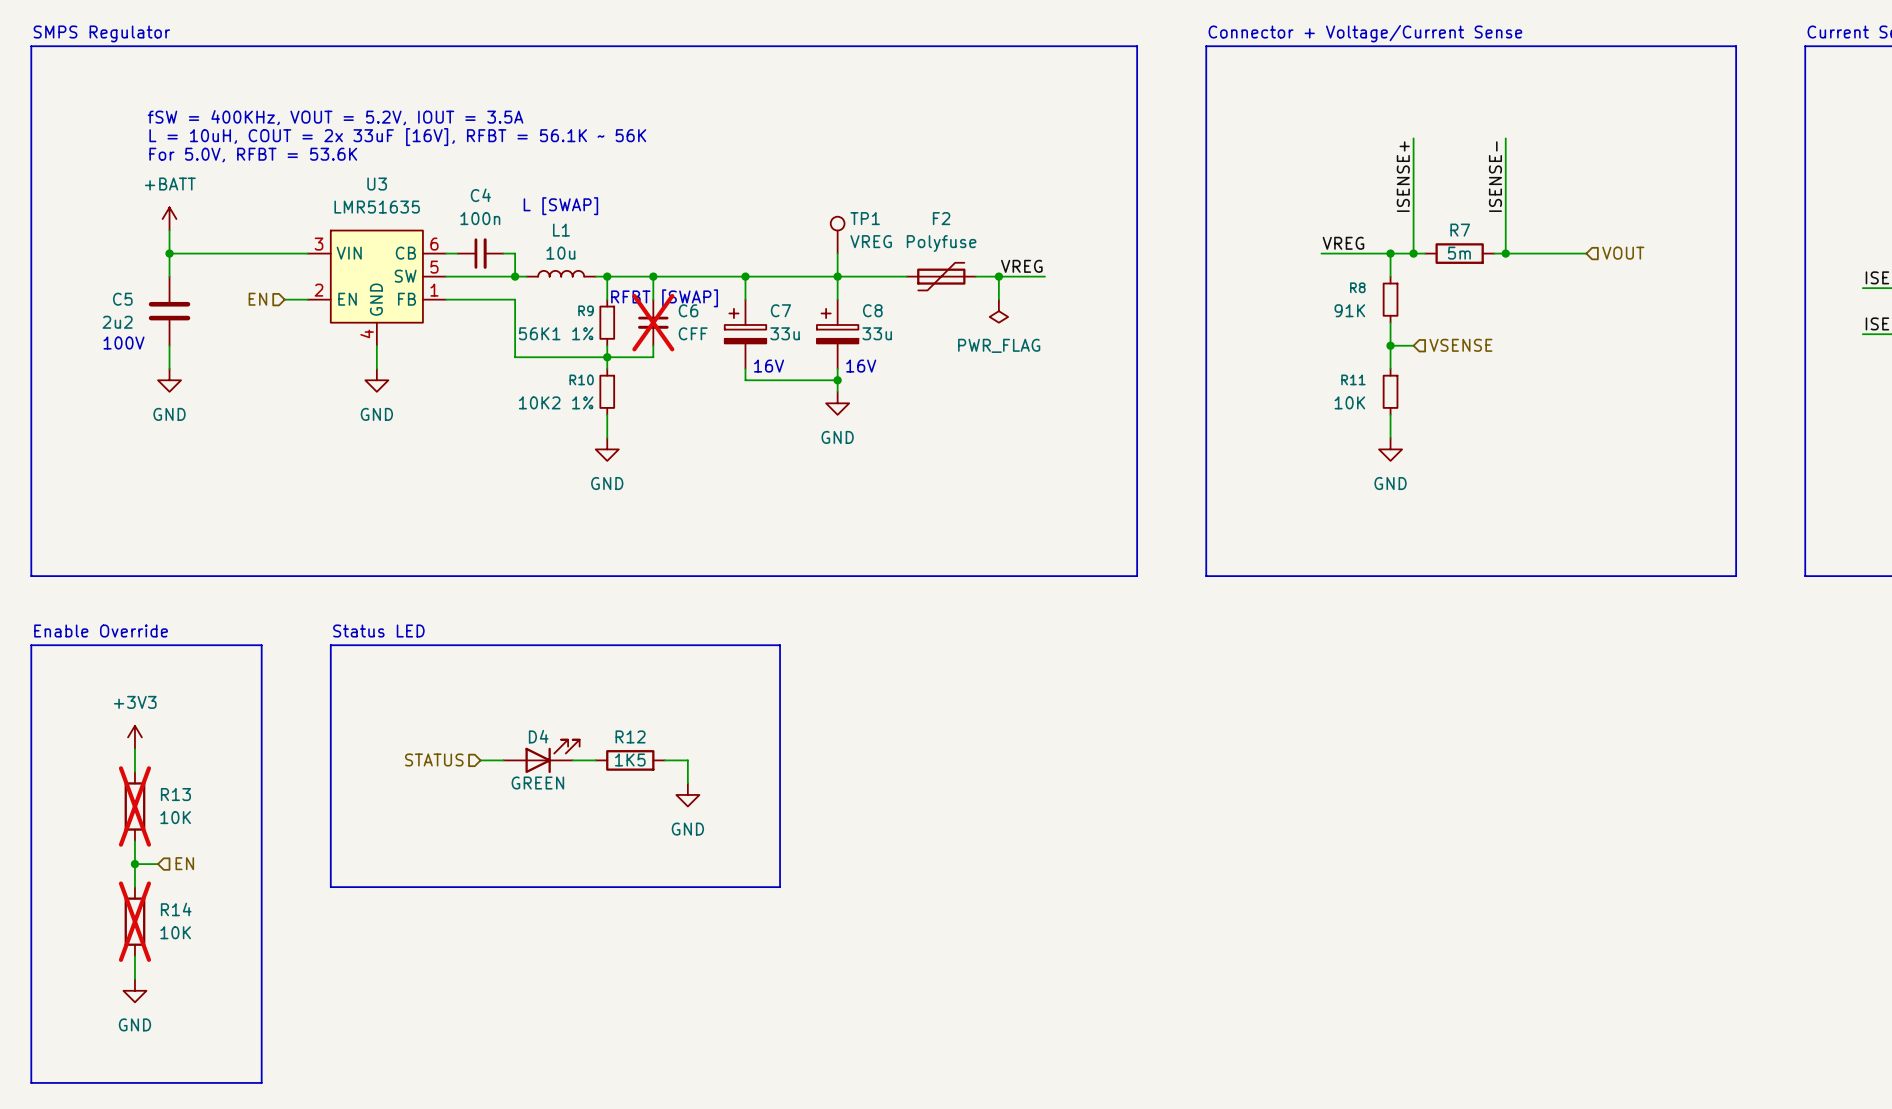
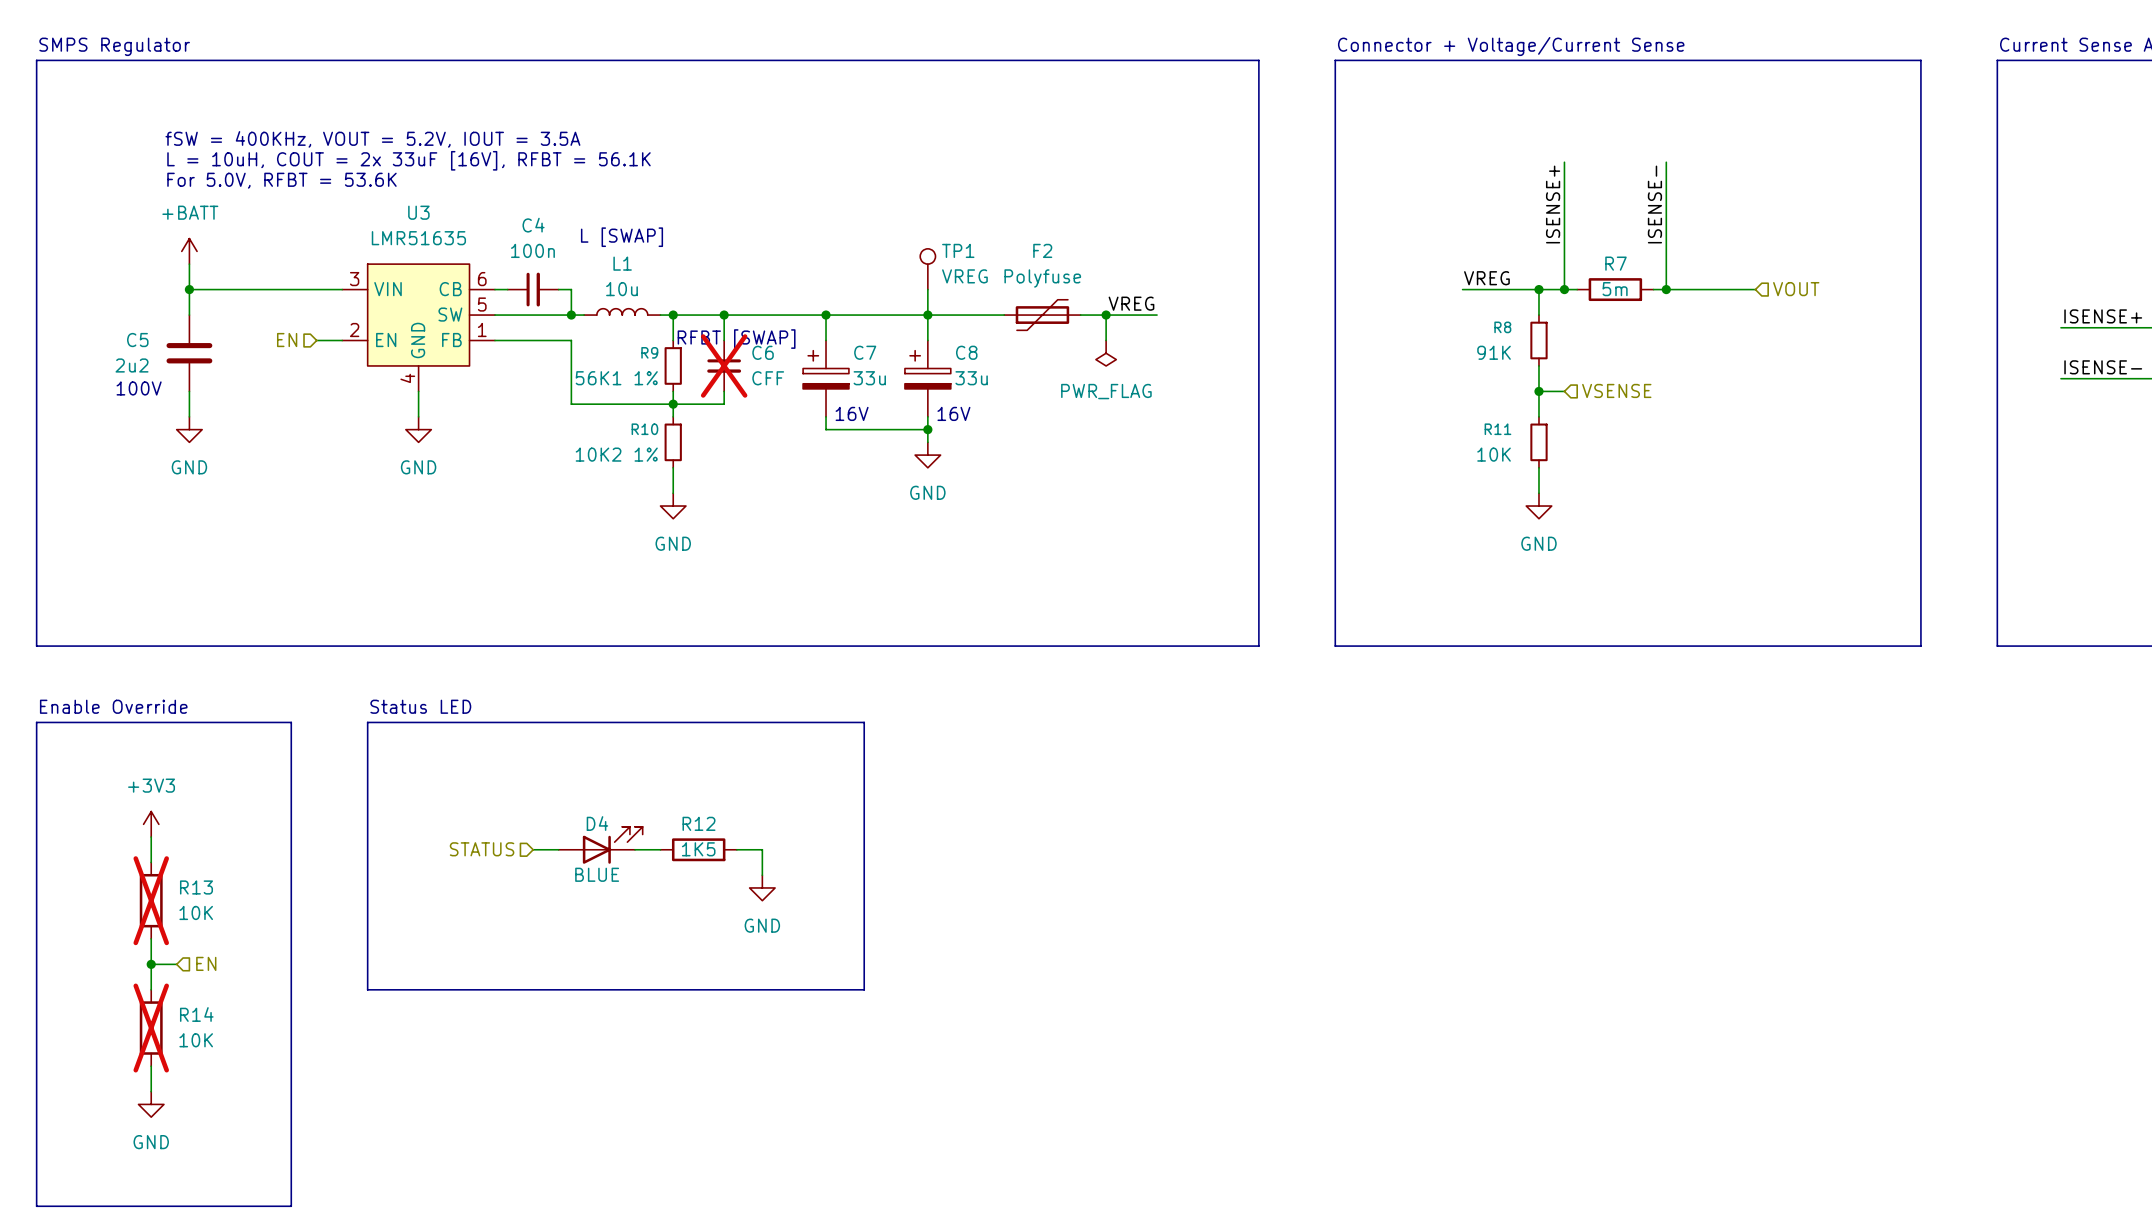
text: L = 10uH, COUT = 2x 33uF [16V], RFBT = 56.1K ~ 56K (397, 137) -> L = 10uH, COUT = 2x 33uF [16V], RFBT = 56.1K (408, 160)
D4 value: GREEN (537, 783) -> BLUE (597, 874)

